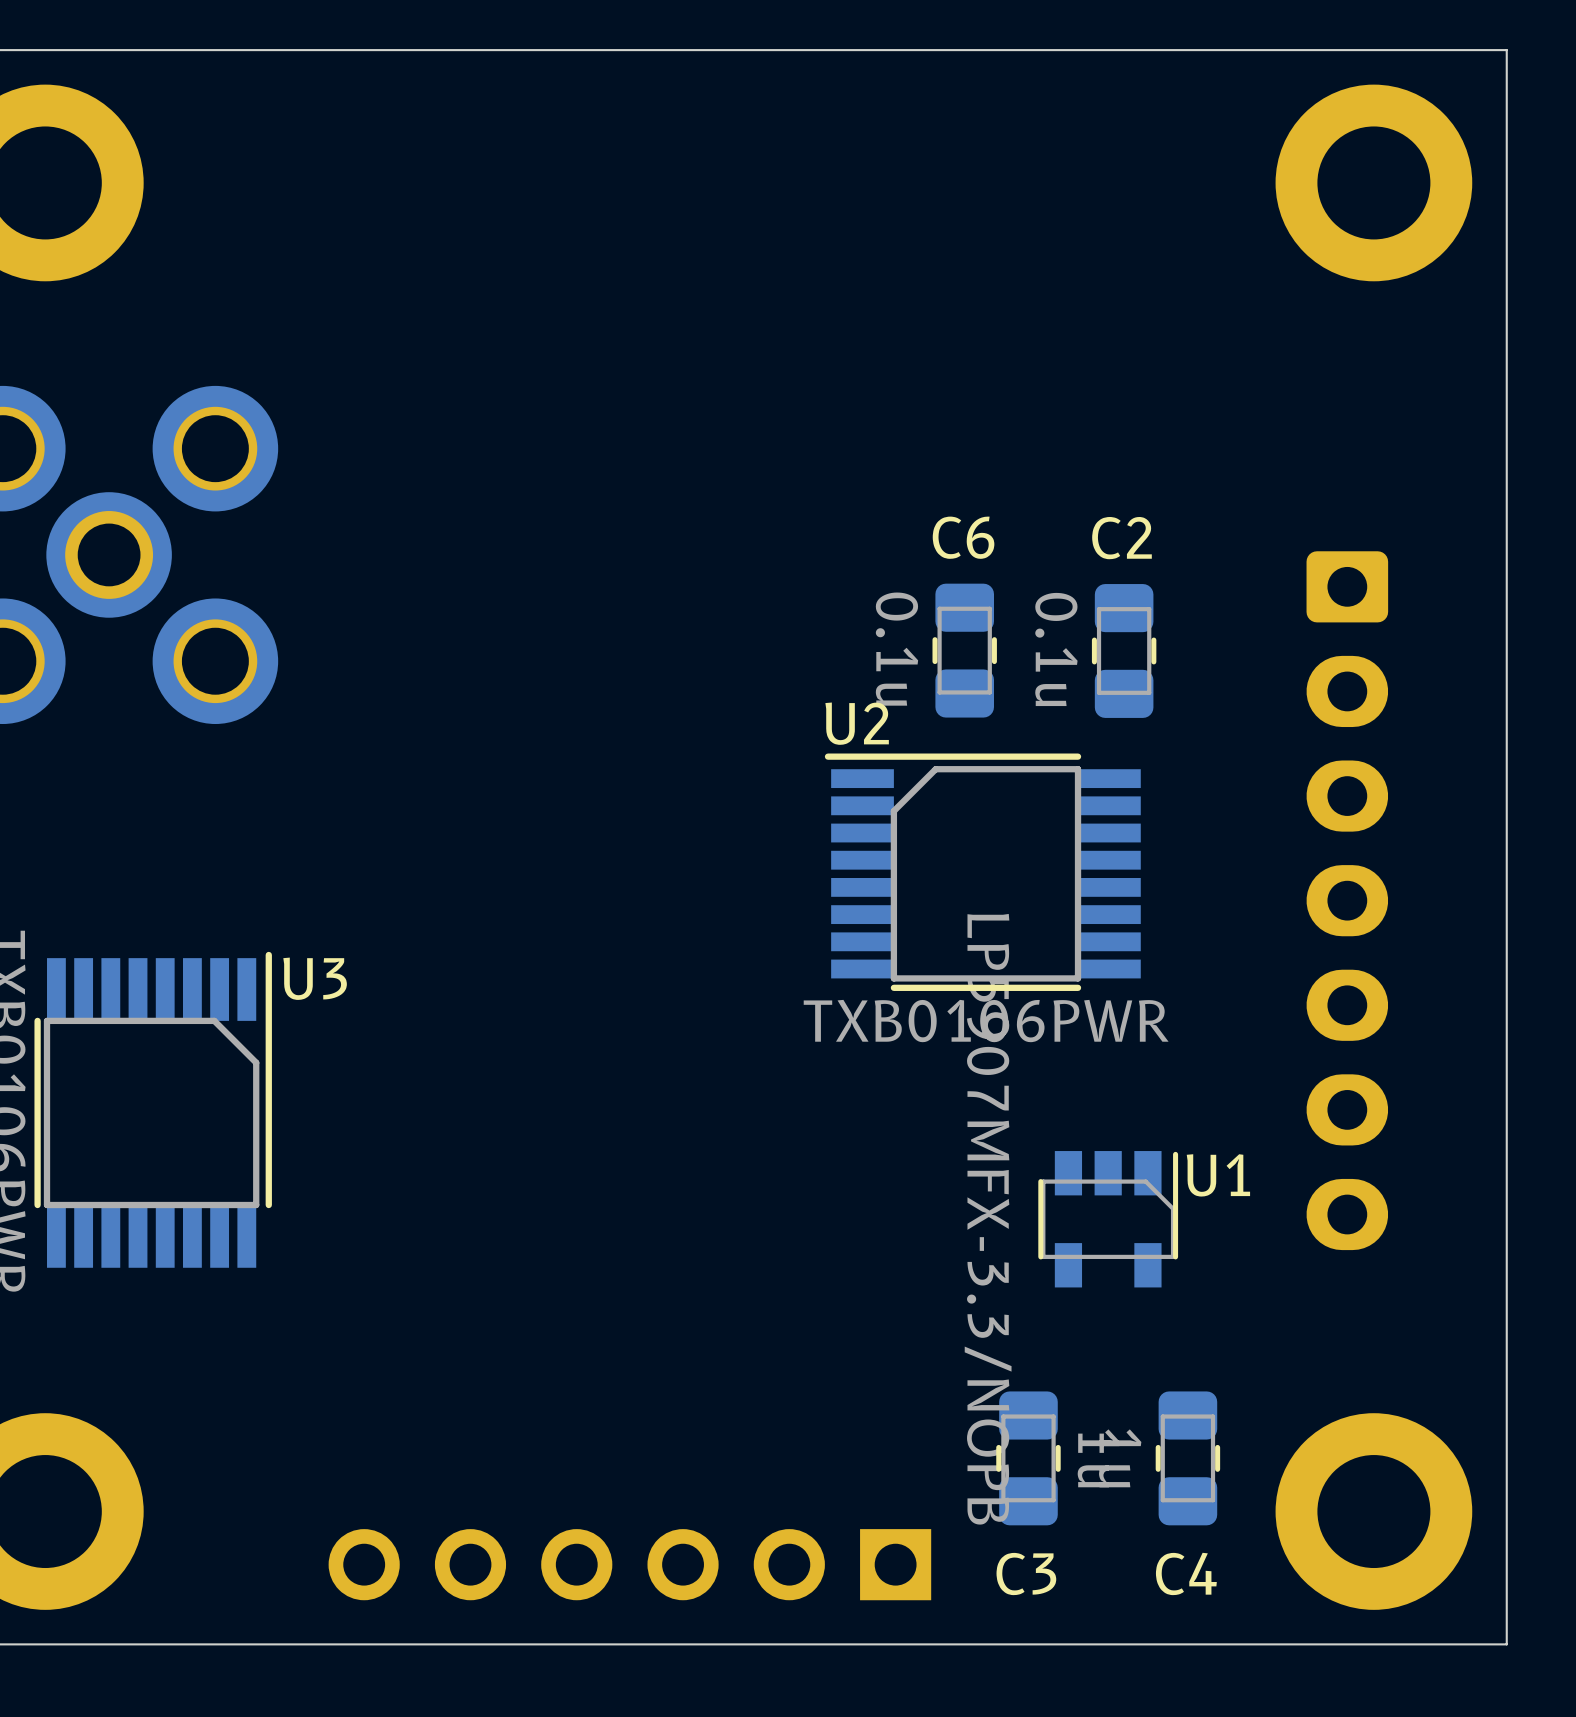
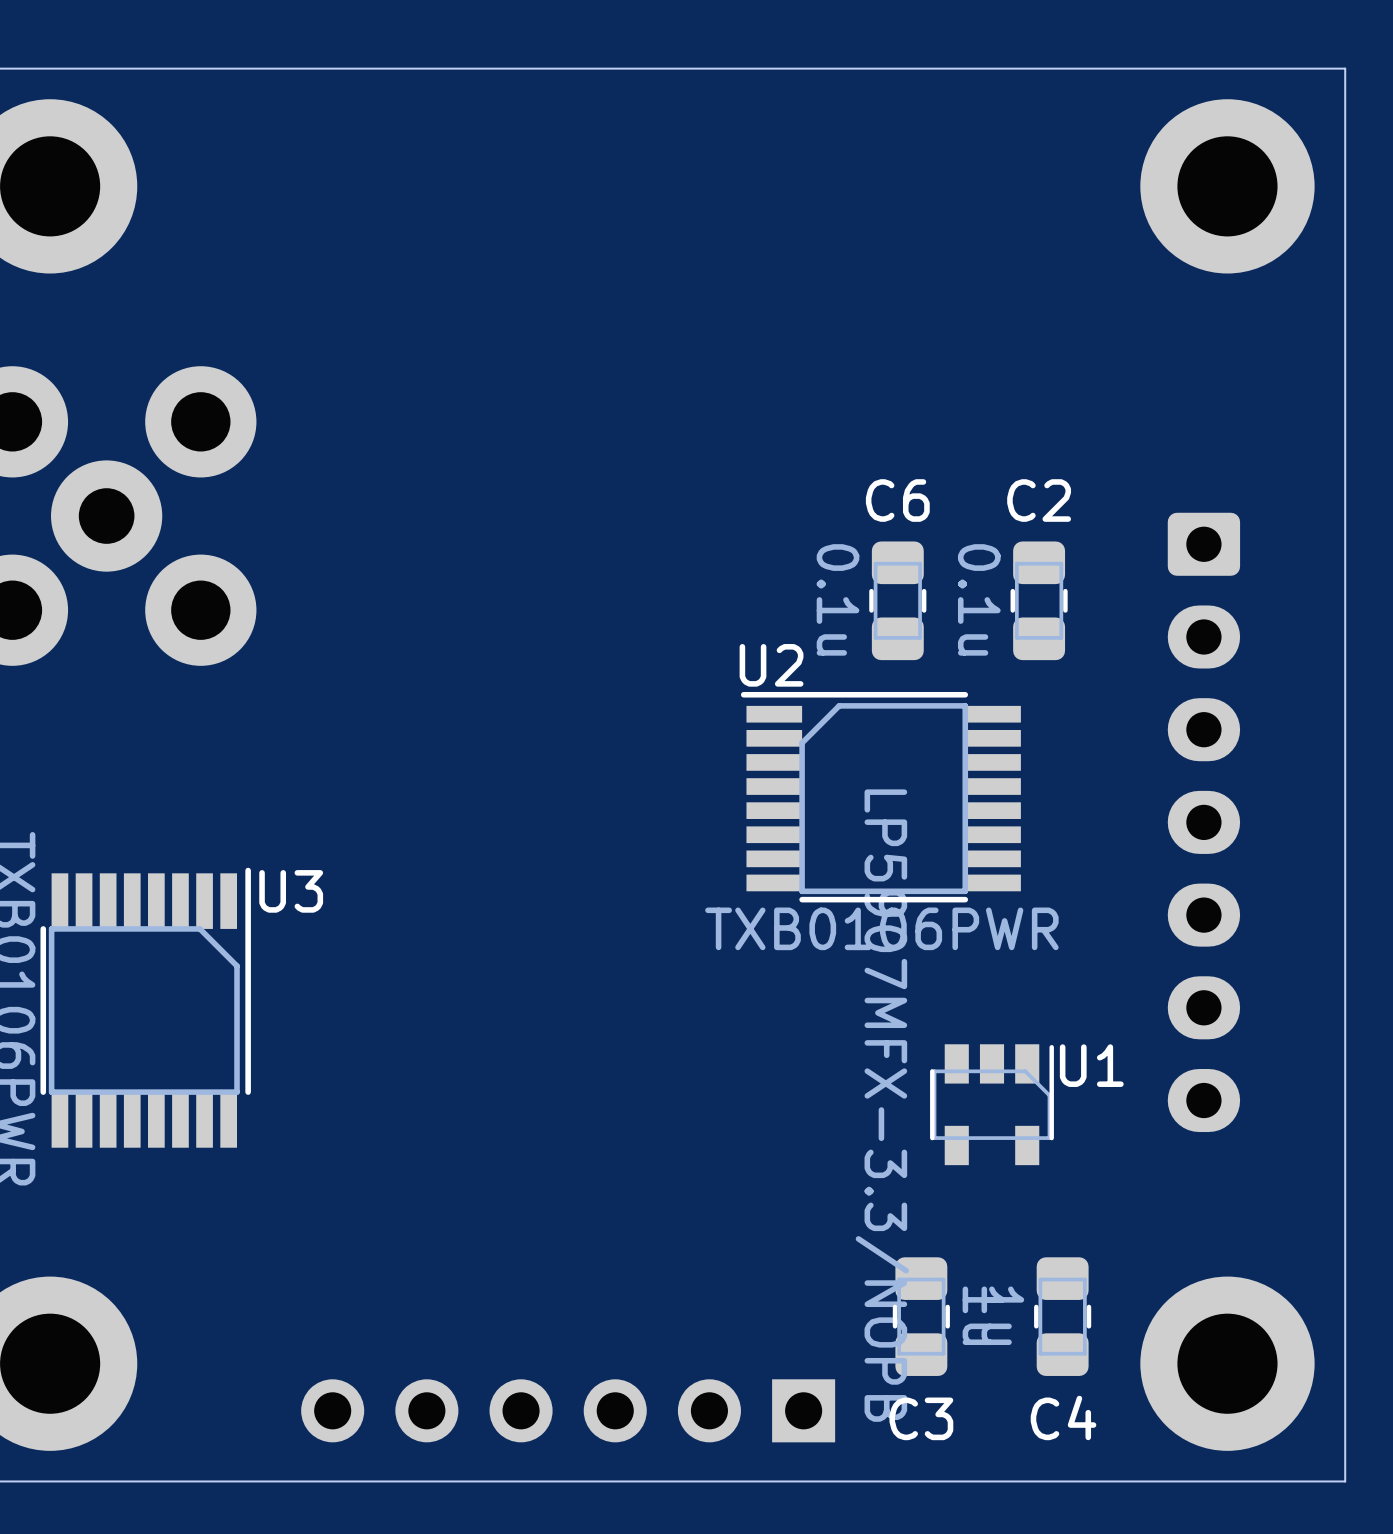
C6 position: (964, 650) -> (897, 600)
C2 position: (1124, 650) -> (1039, 600)

